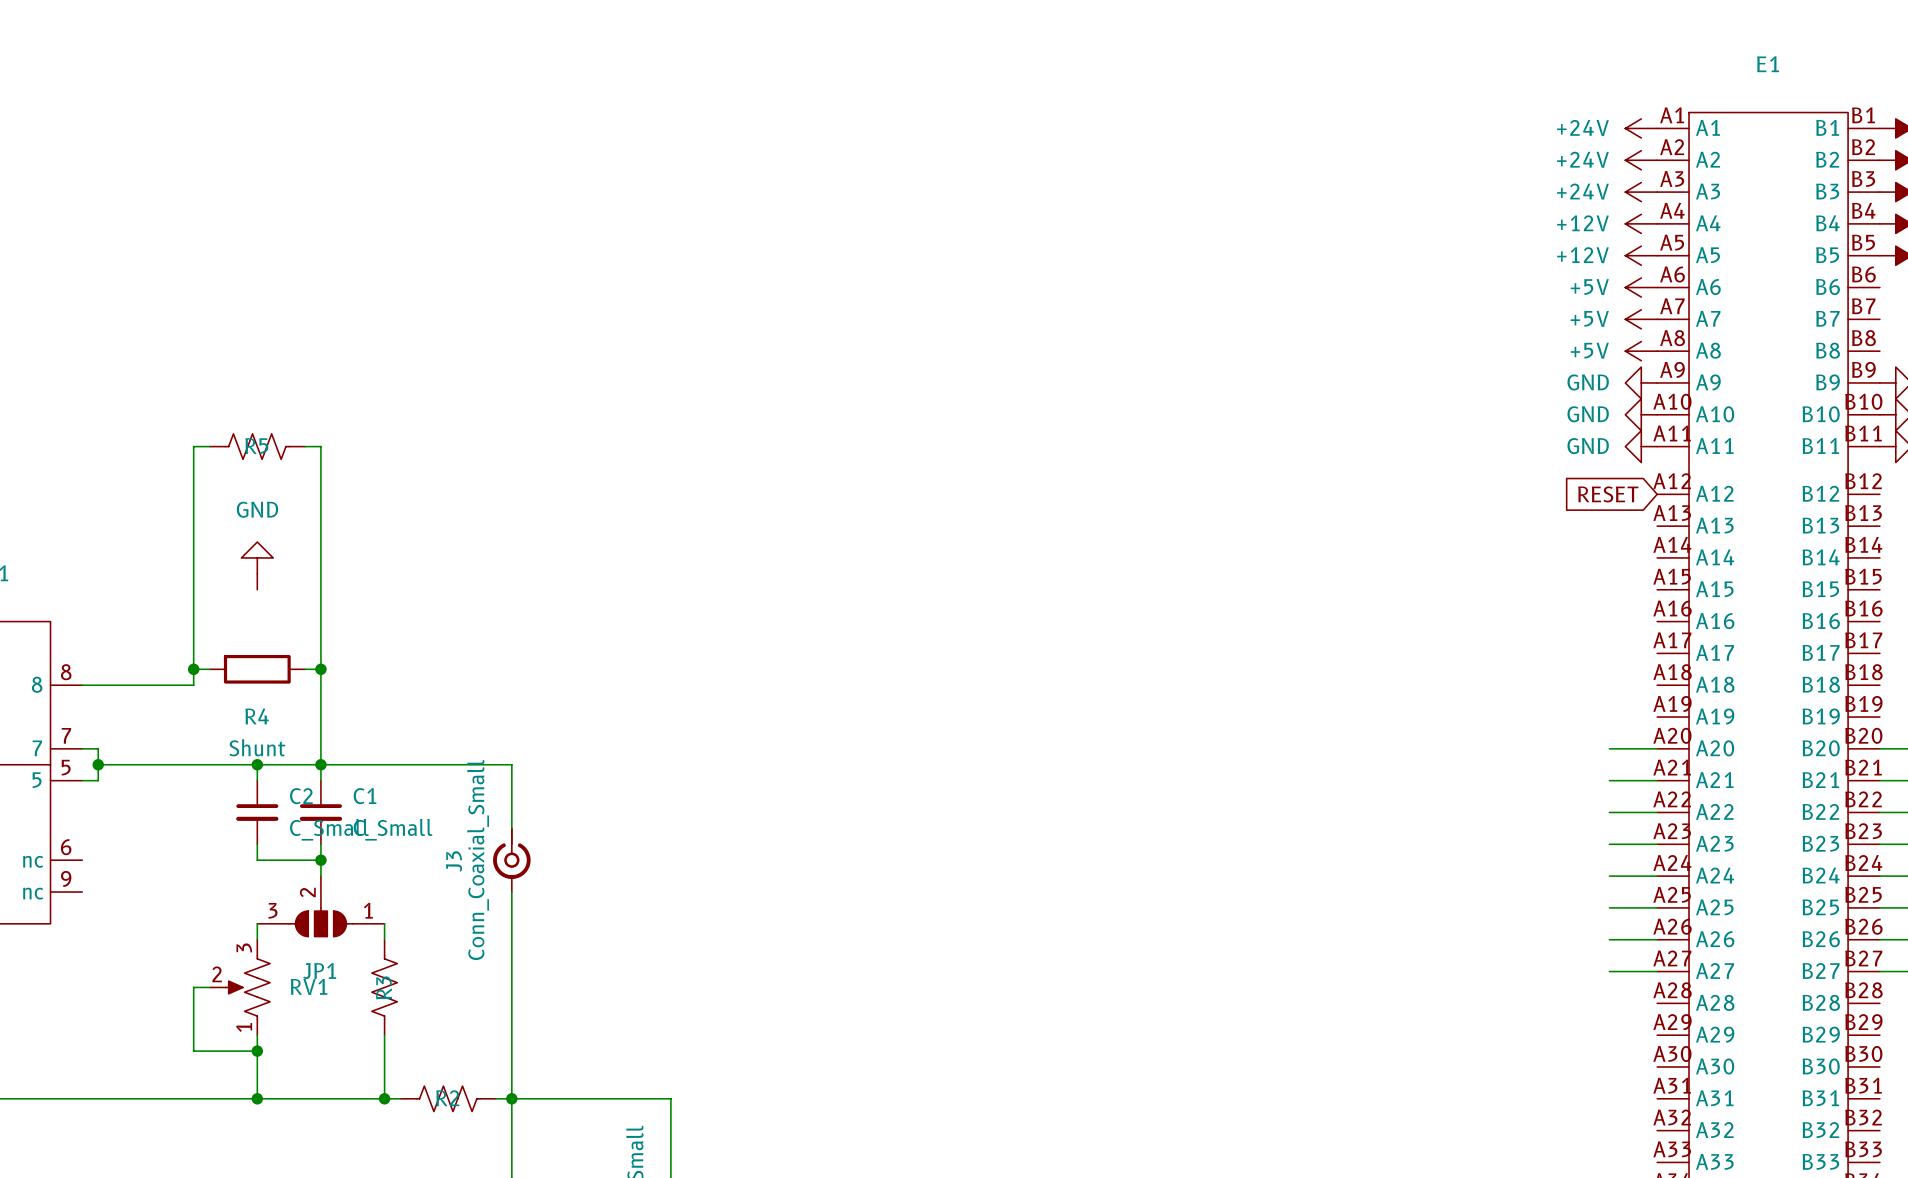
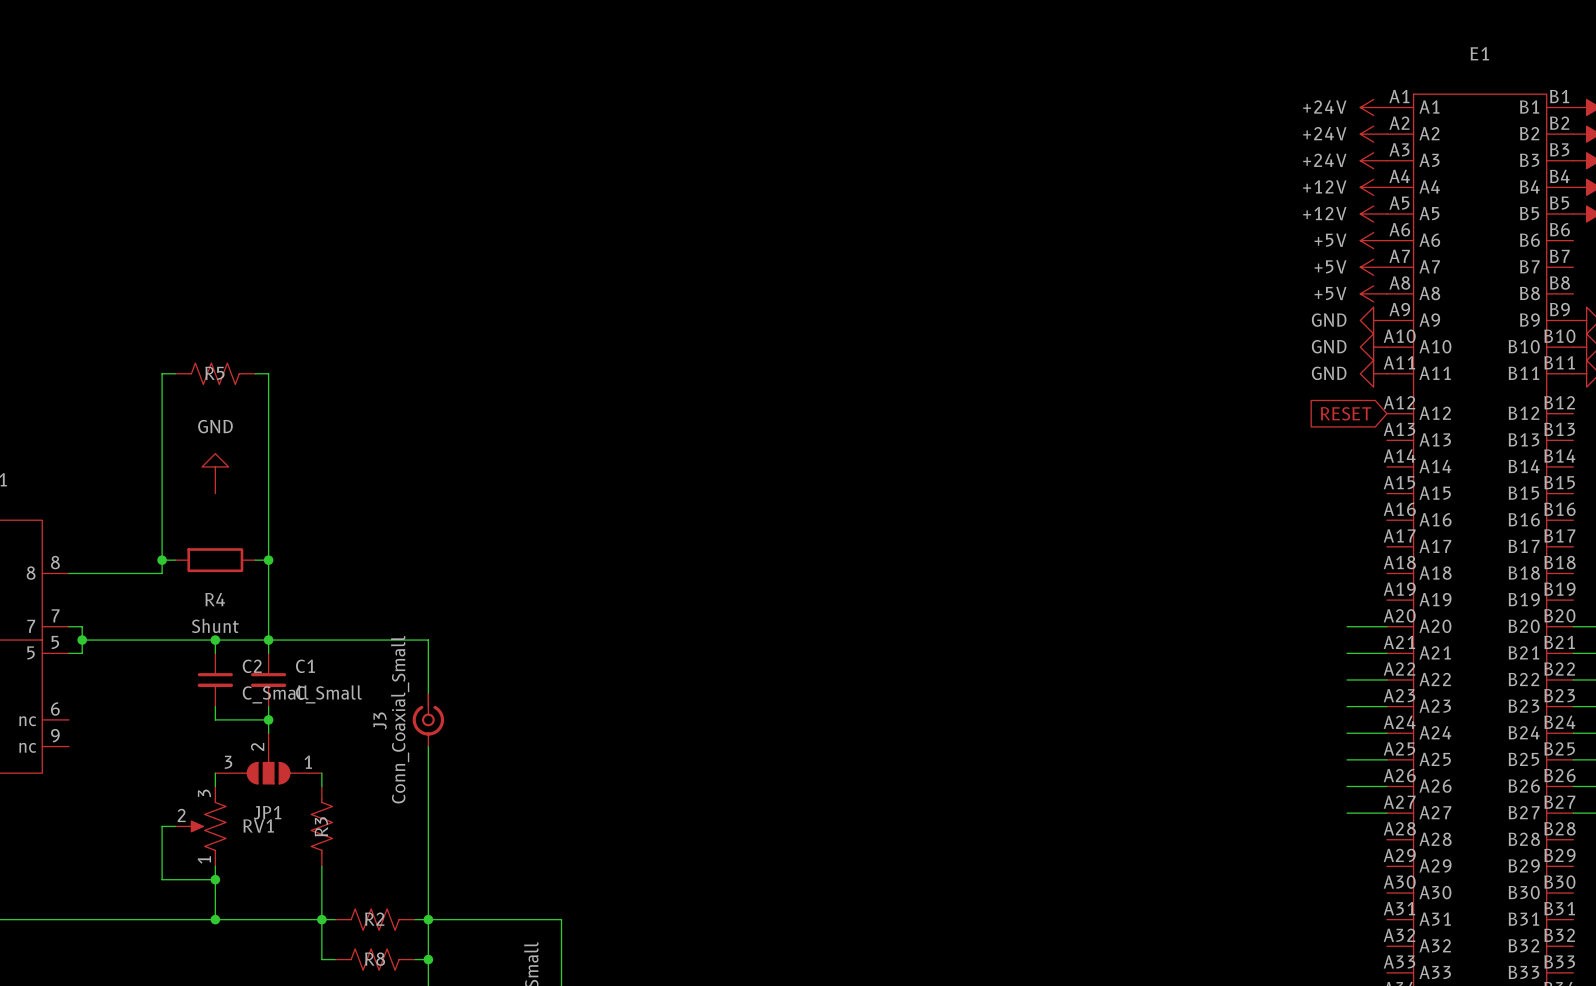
wire: none -> (321, 919) (321, 959) (335, 959)
R8: none -> (375, 959)
wire: none -> (415, 959) (428, 959)
junction: none -> (428, 959)

